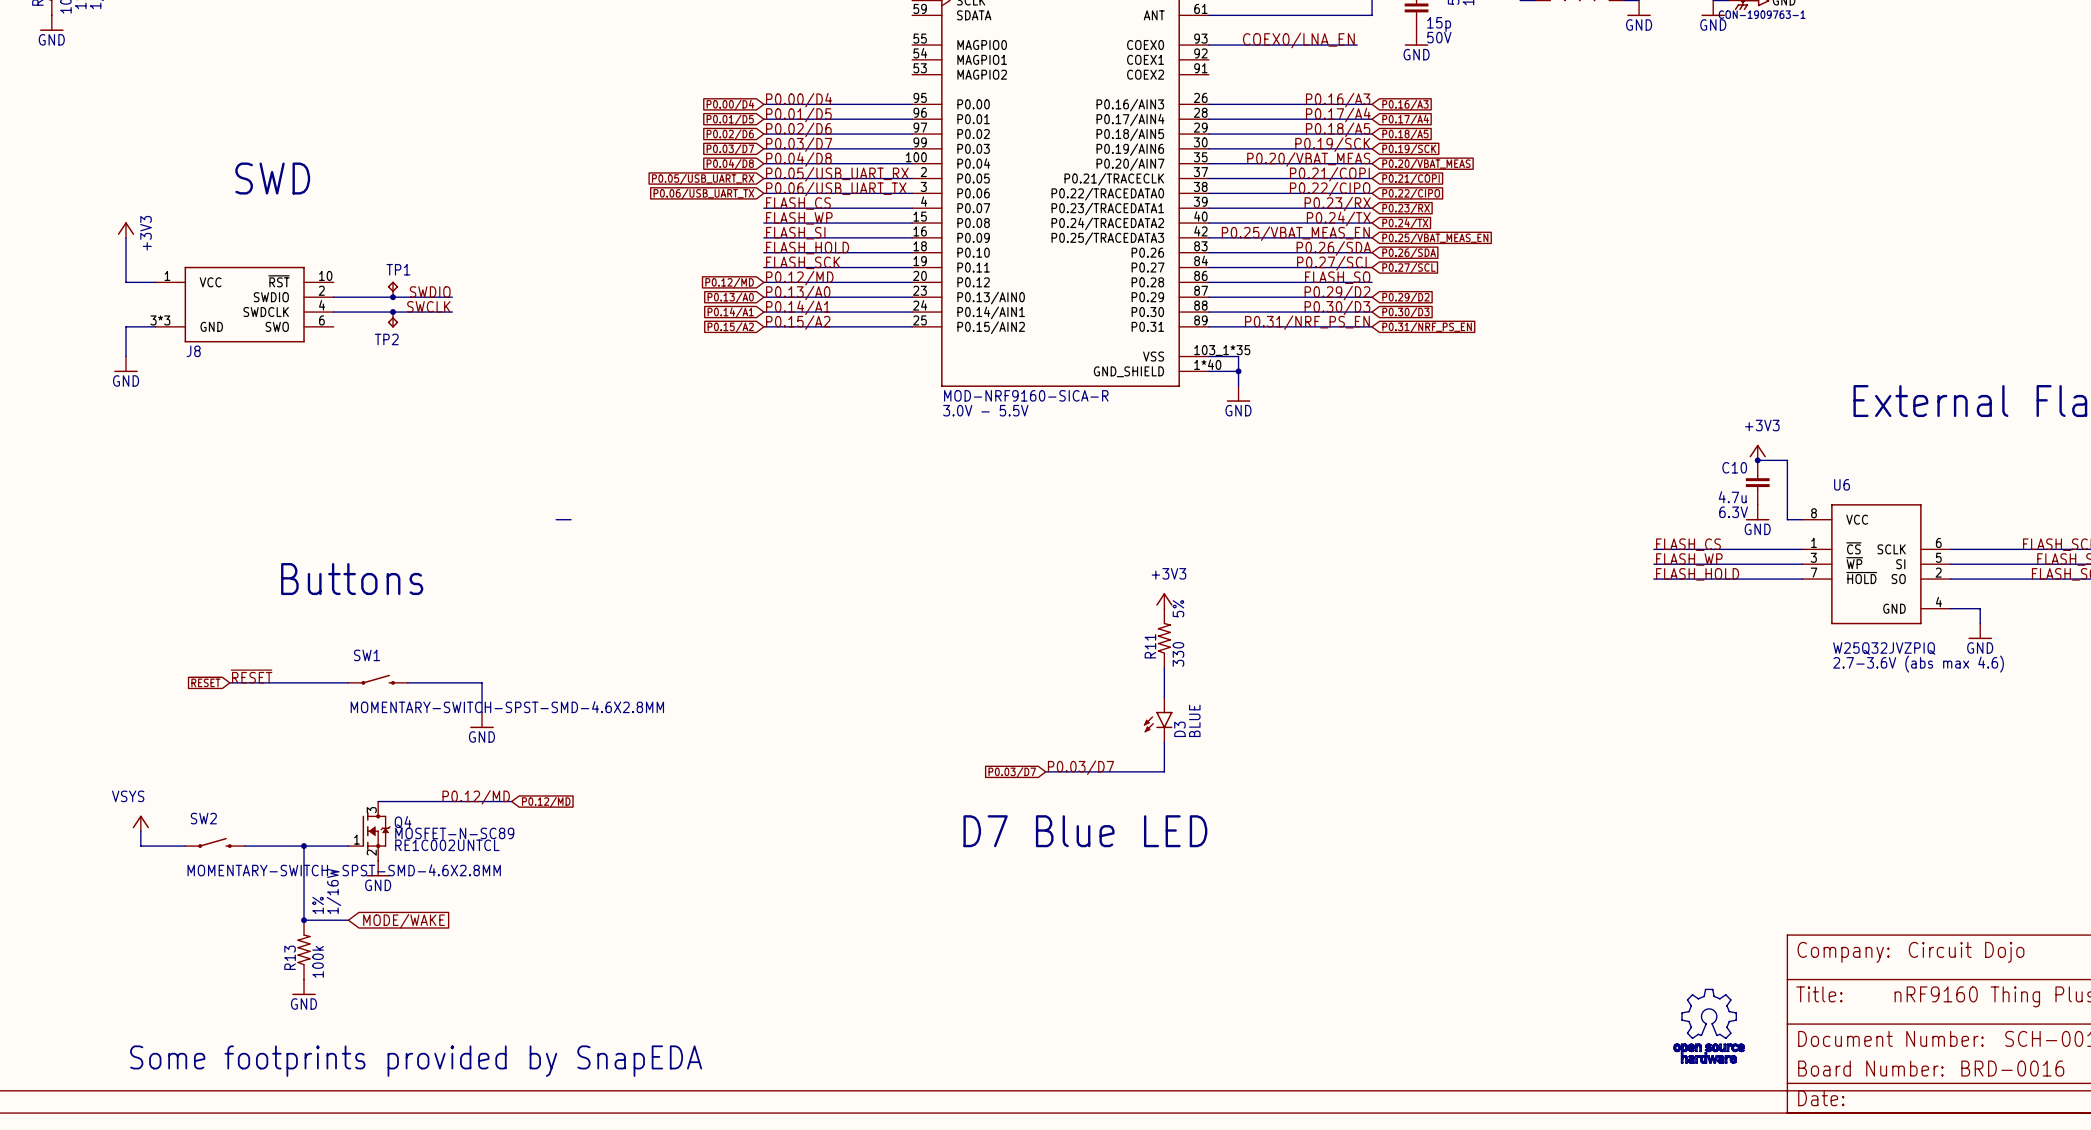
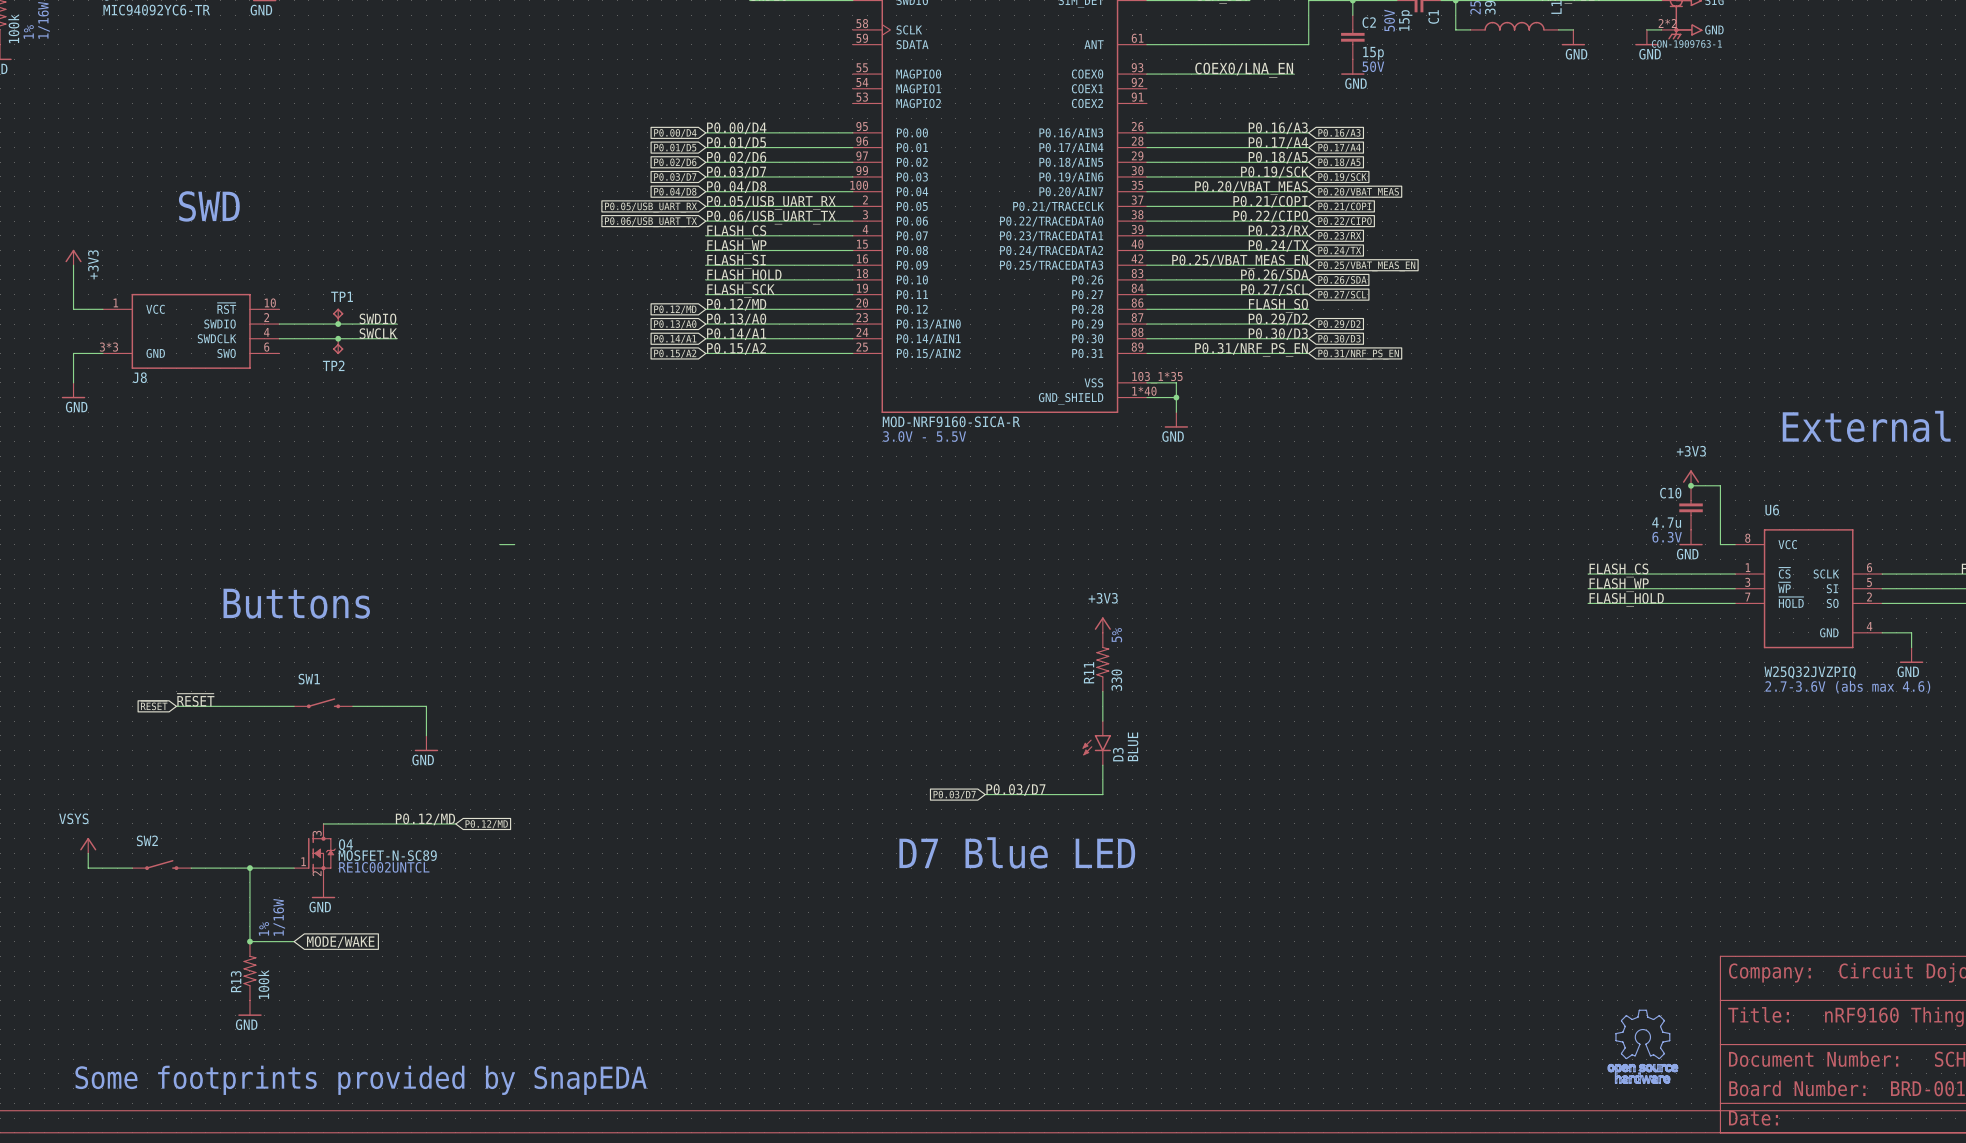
SW1 value: MOMENTARY-SWITCH-SPST-SMD-4.6X2.8MM (507, 707) -> none
SW2 value: MOMENTARY-SWITCH-SPST-SMD-4.6X2.8MM (344, 870) -> none

